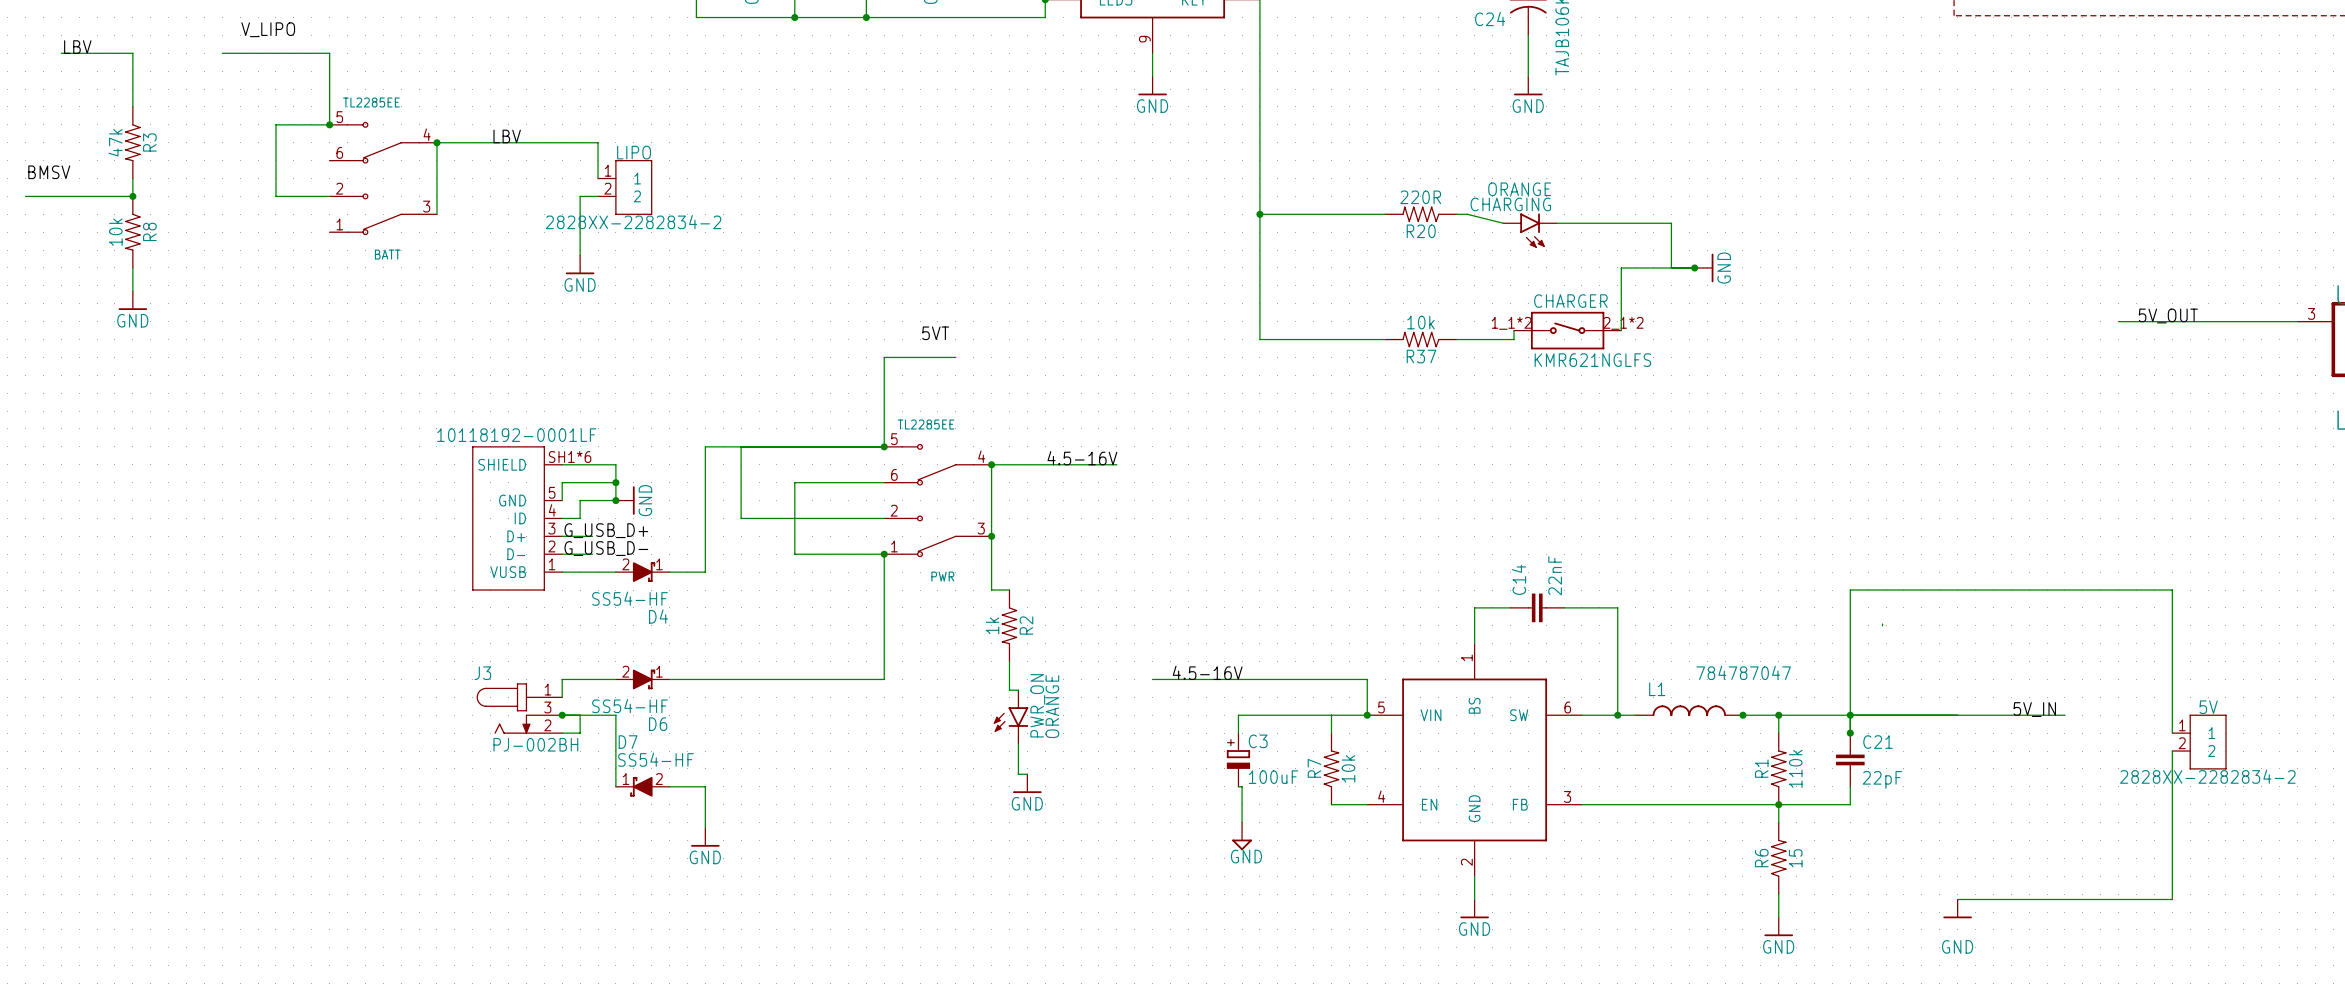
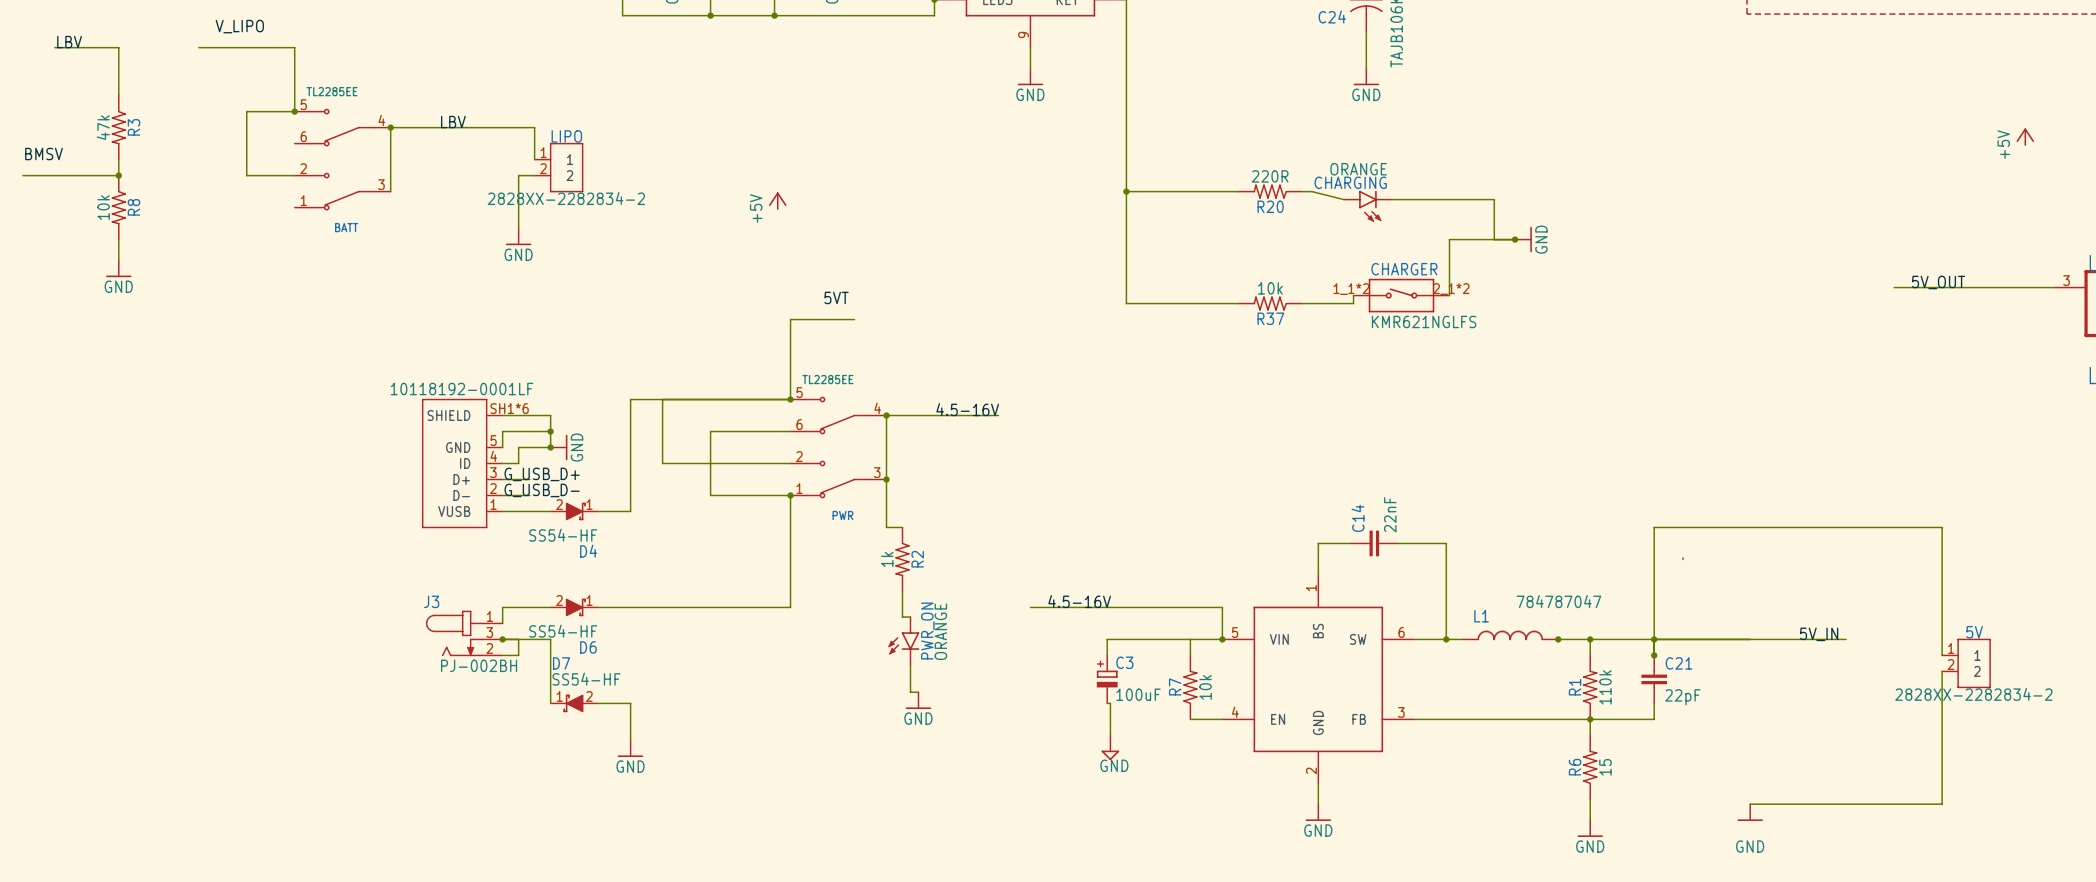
power symbol: none -> +5V (2025, 136)
power symbol: none -> +5V (777, 200)

